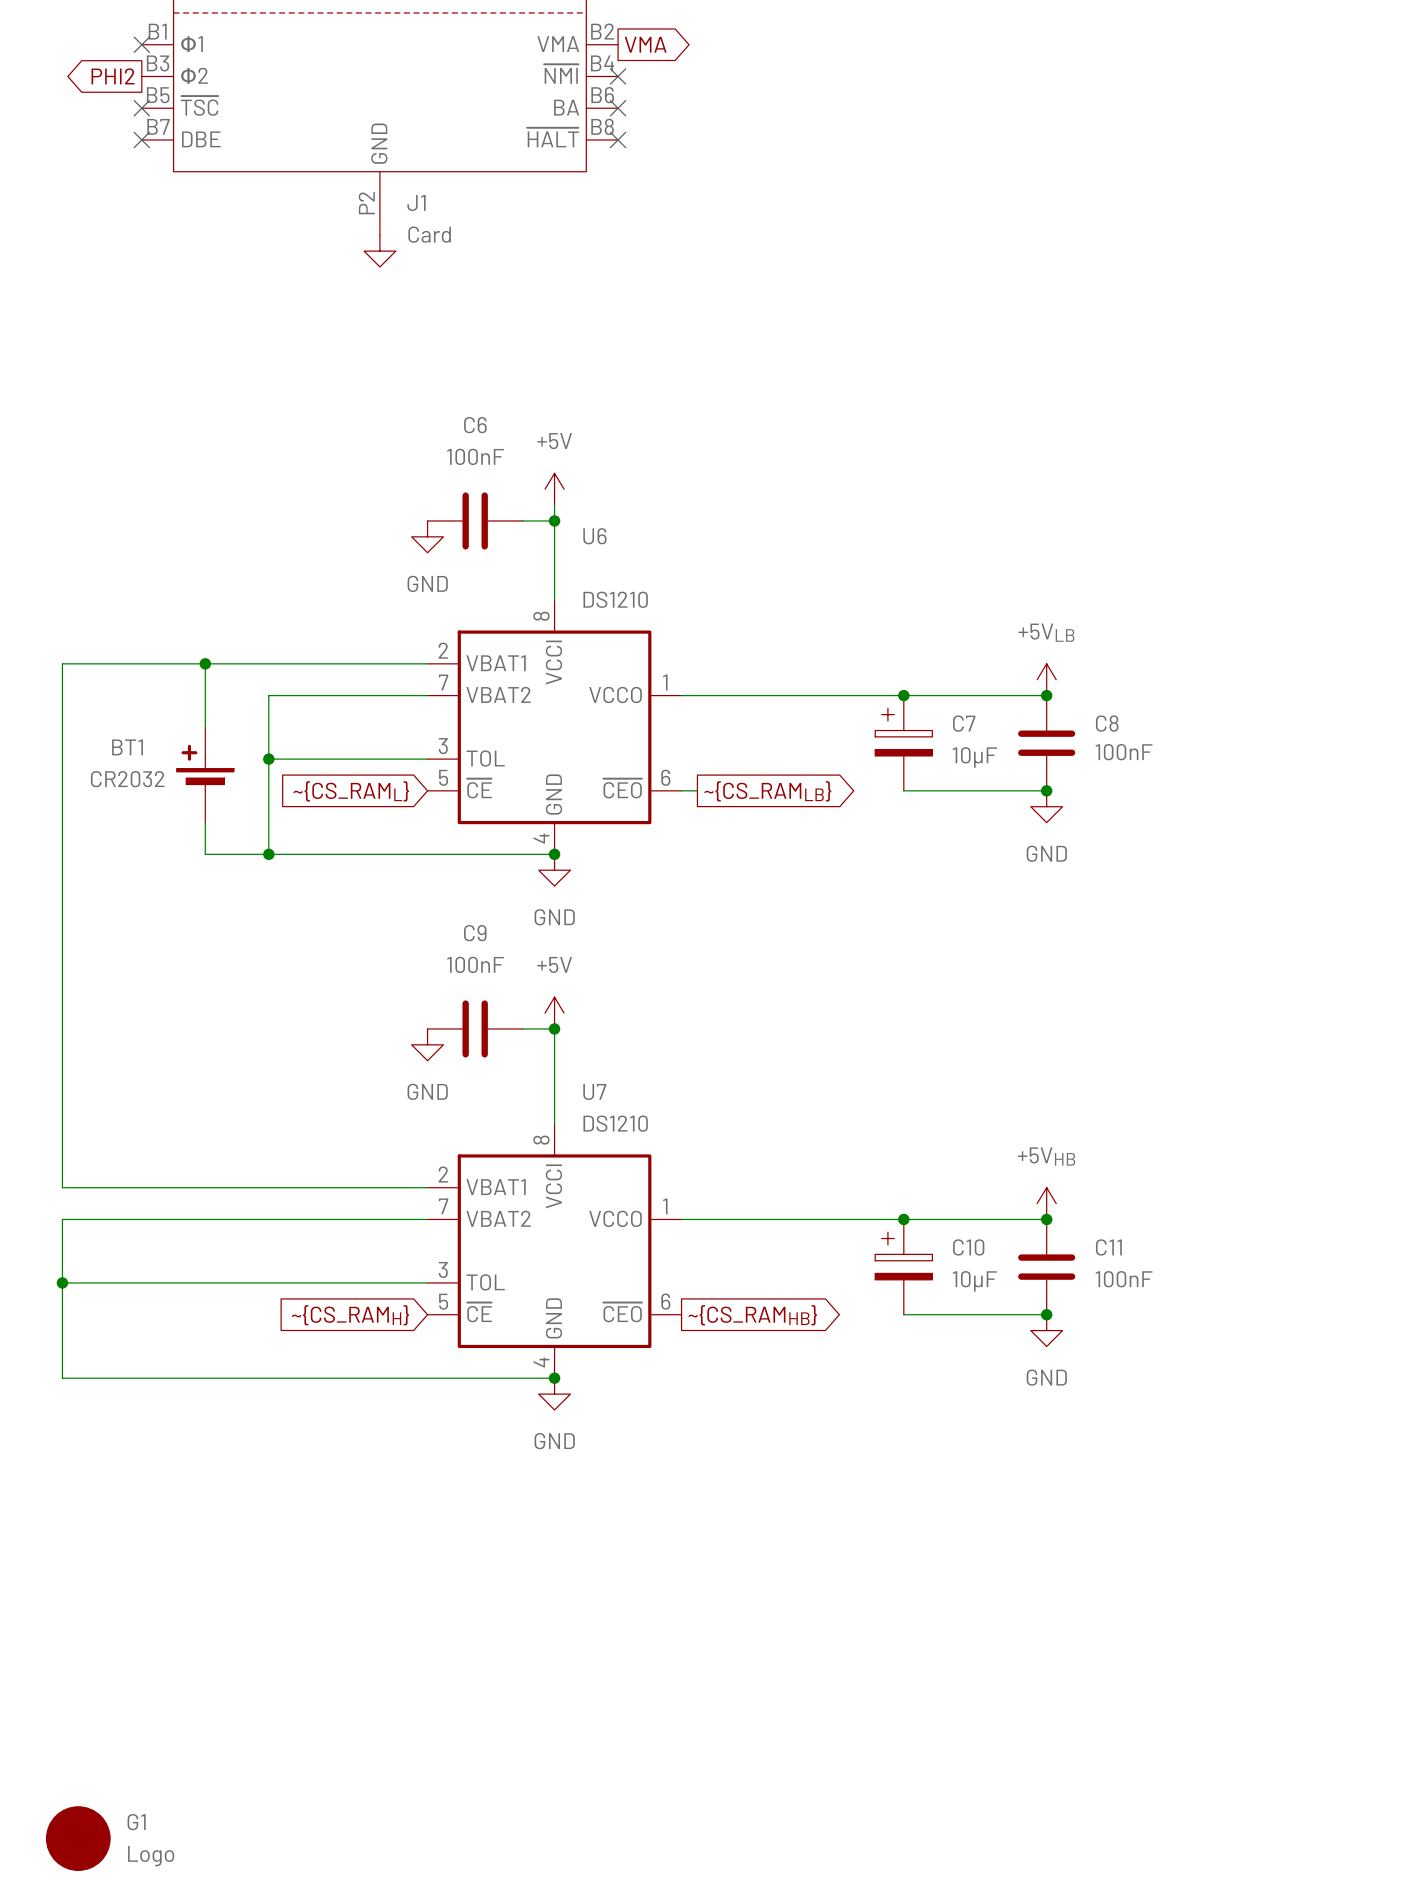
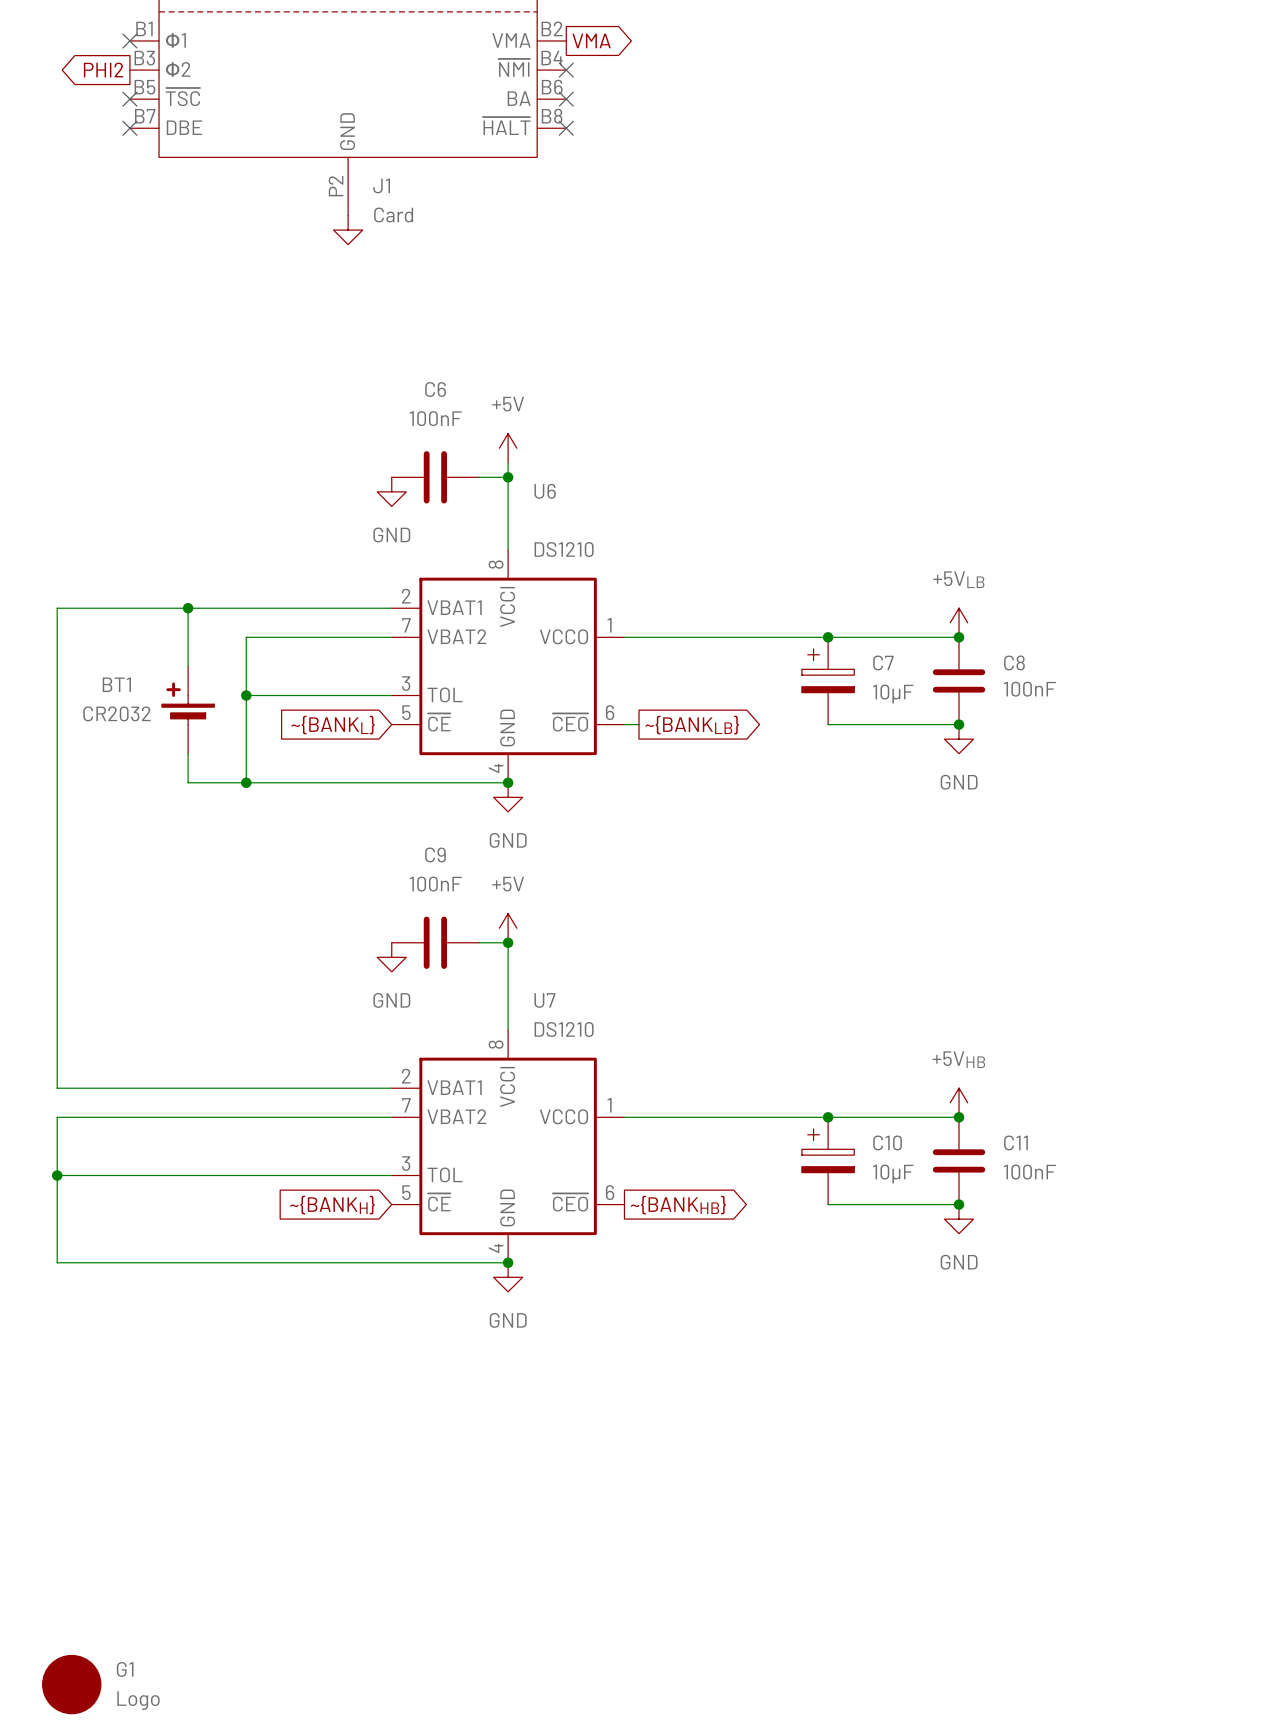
global label: ~{CS_RAML} (351, 791) -> ~{BANKL} (333, 725)
global label: ~{CS_RAMLB} (767, 791) -> ~{BANKLB} (692, 725)
global label: ~{CS_RAMH} (350, 1315) -> ~{BANKH} (332, 1205)
global label: ~{CS_RAMHB} (752, 1315) -> ~{BANKHB} (678, 1205)

